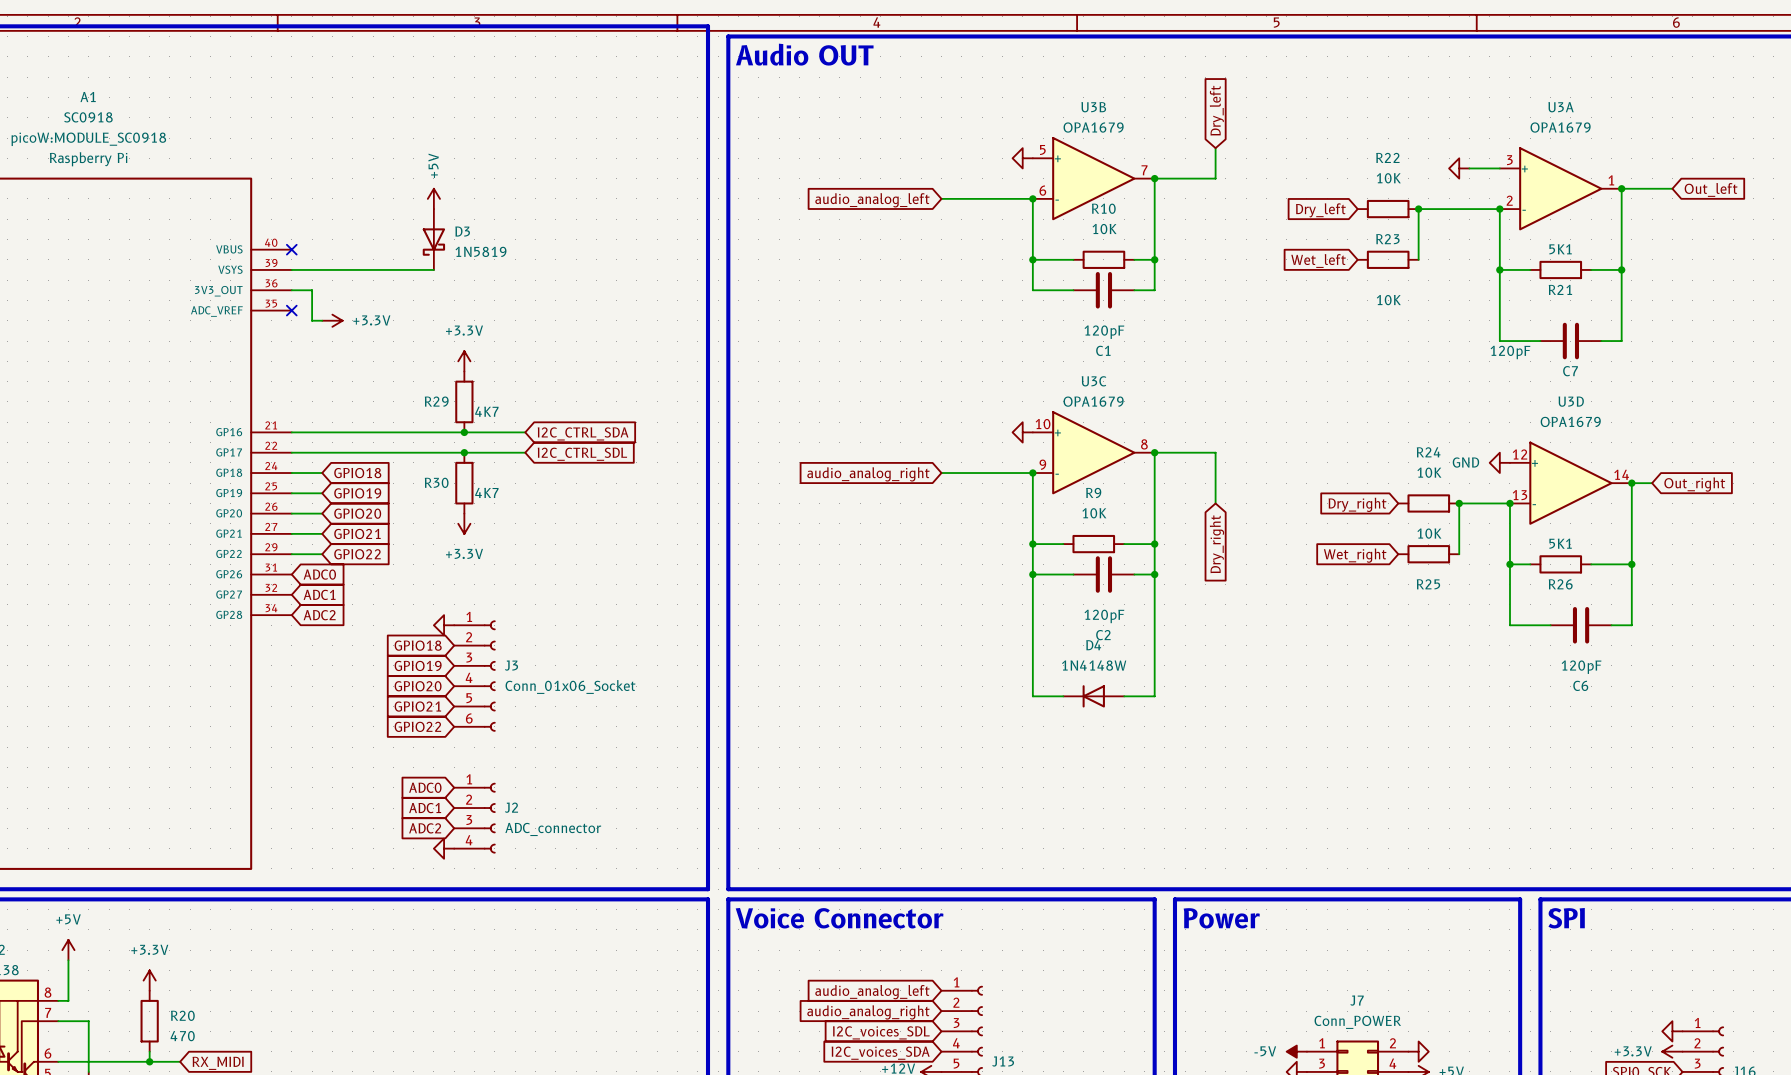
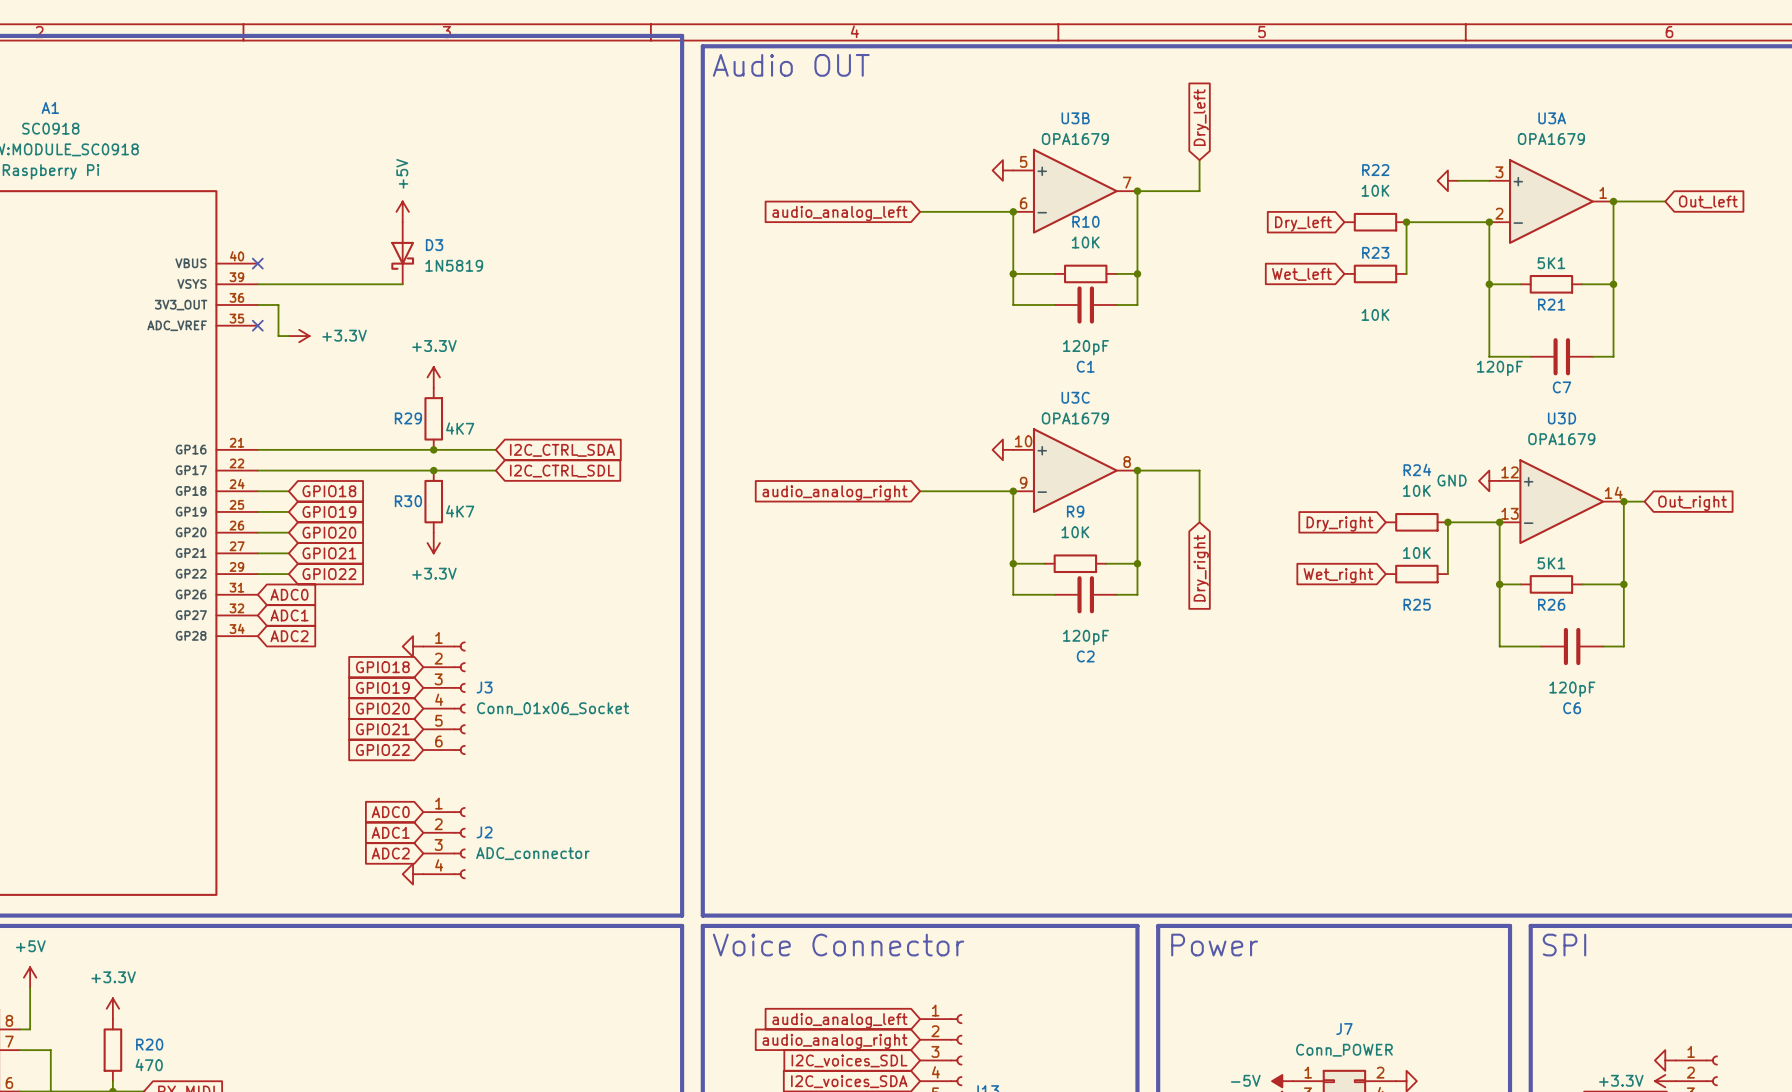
wire: (1032, 574) (1032, 696) (1063, 696) -> none
junction: (1032, 574) -> none
wire: (1154, 574) (1154, 696) (1124, 696) -> none
junction: (1154, 574) -> none
D4: 1N4148W (1093, 696) -> none

